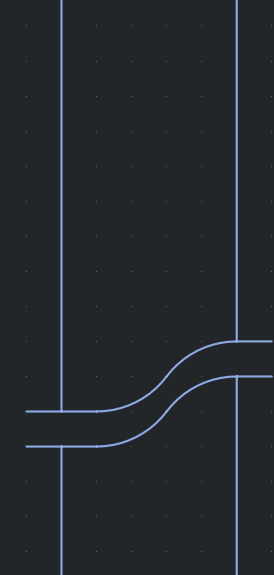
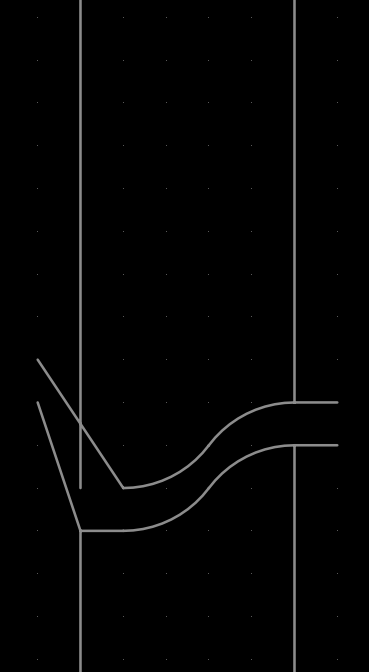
line: (26, 411) (96, 411) -> (37, 359) (123, 488)
line: (26, 446) (61, 446) -> (37, 402) (80, 530)

